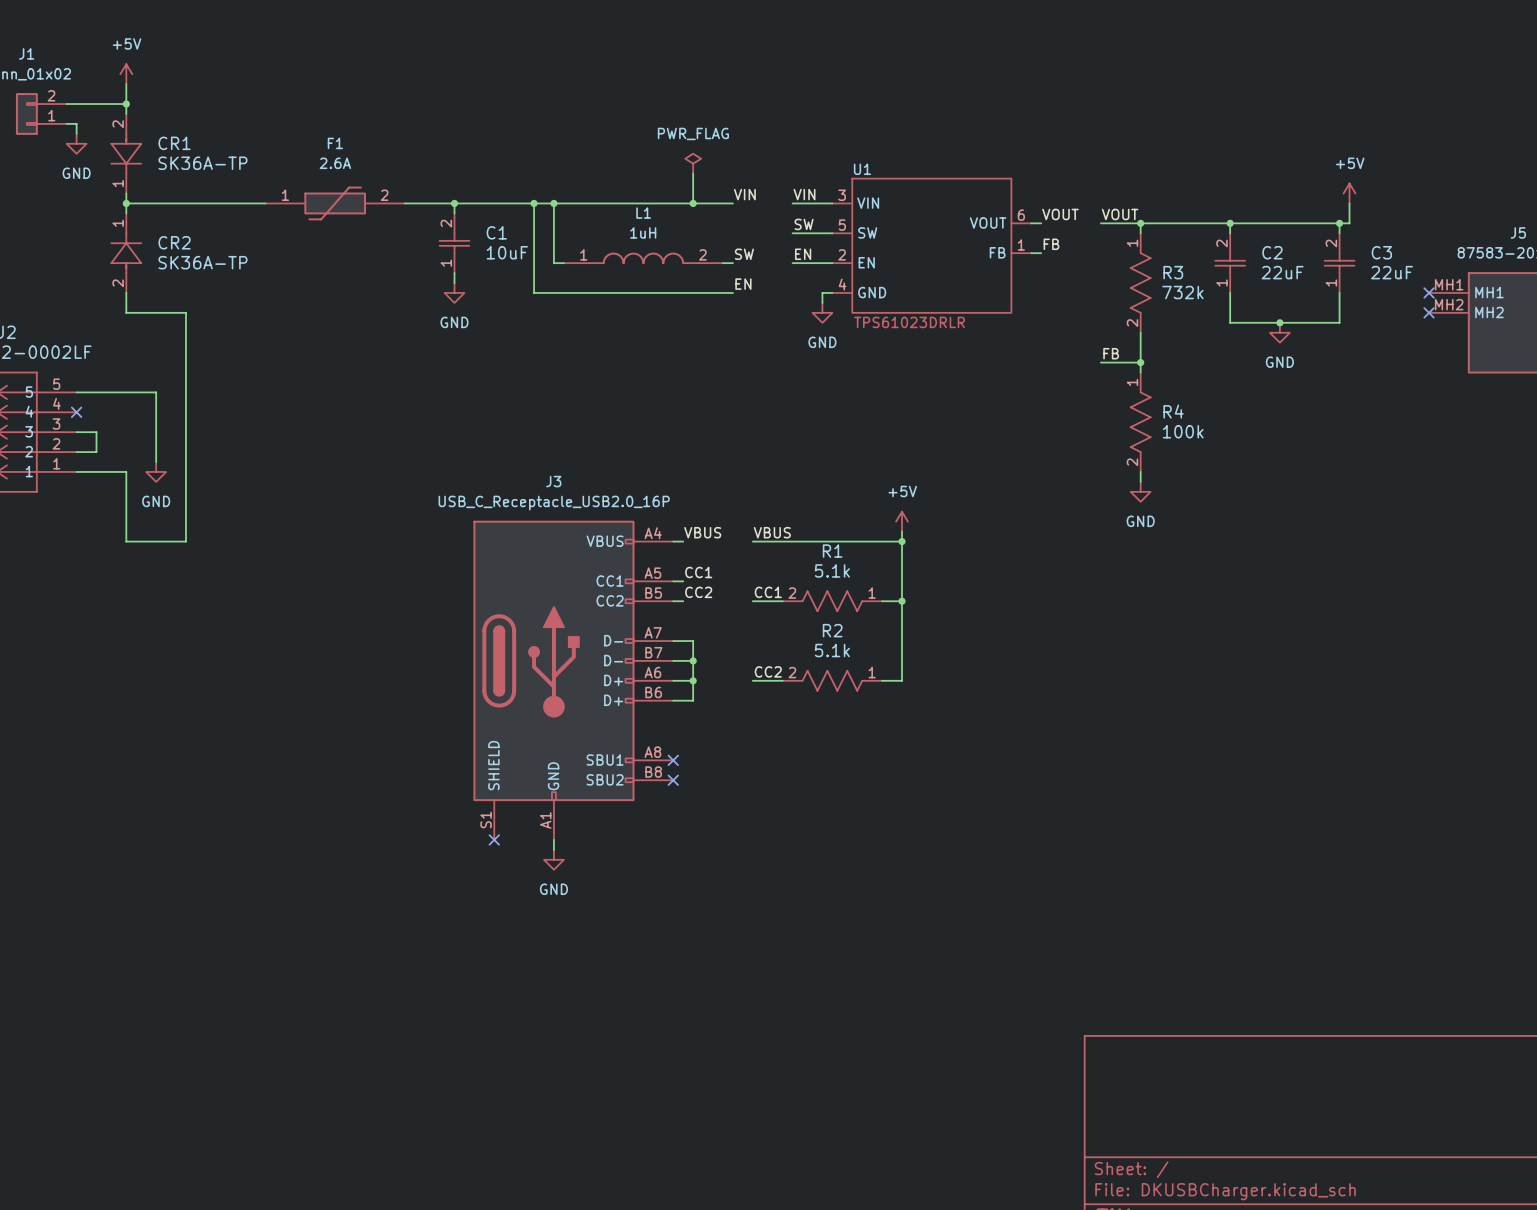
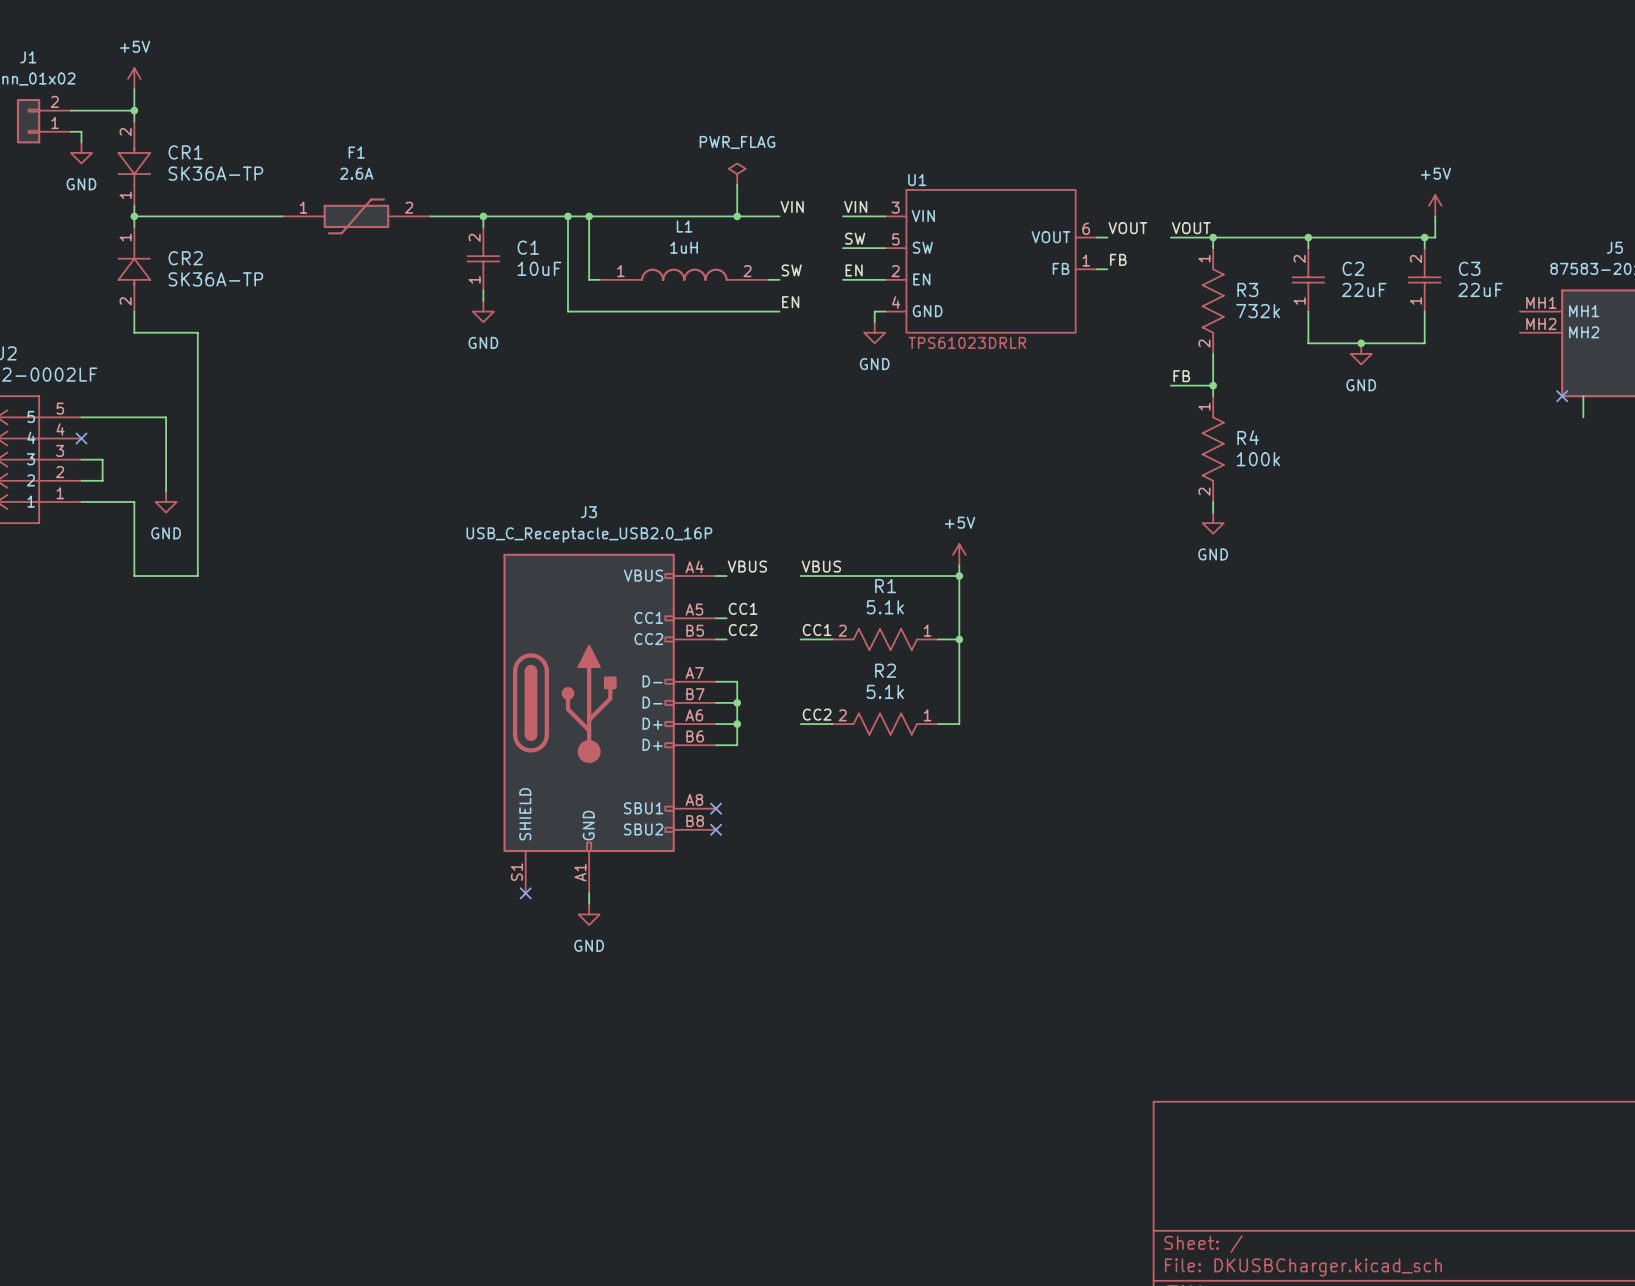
no-connect mark: (1429, 292) -> none
no-connect mark: (1429, 312) -> none
no-connect mark: none -> (1562, 396)
wire: none -> (1583, 396) (1583, 417)

